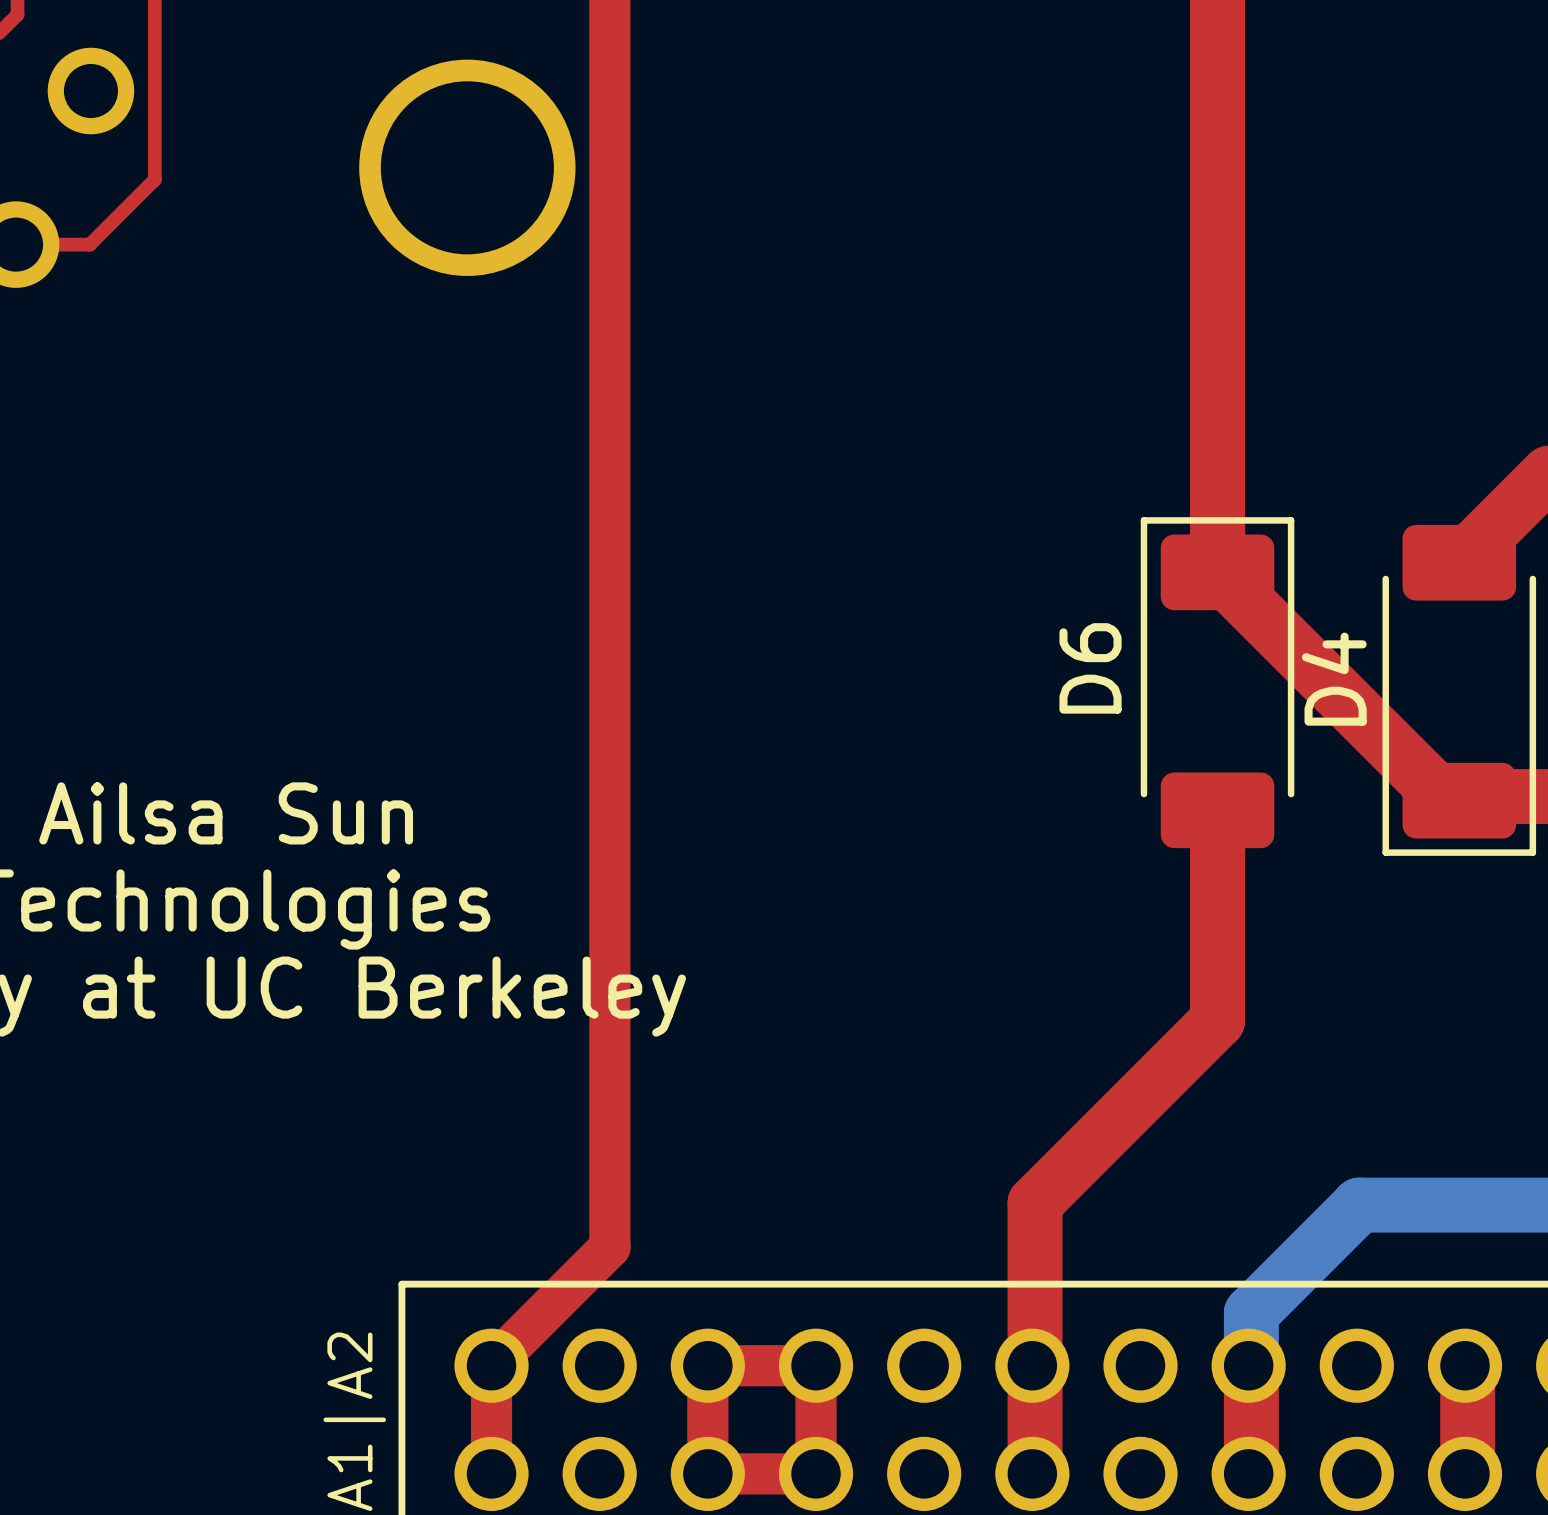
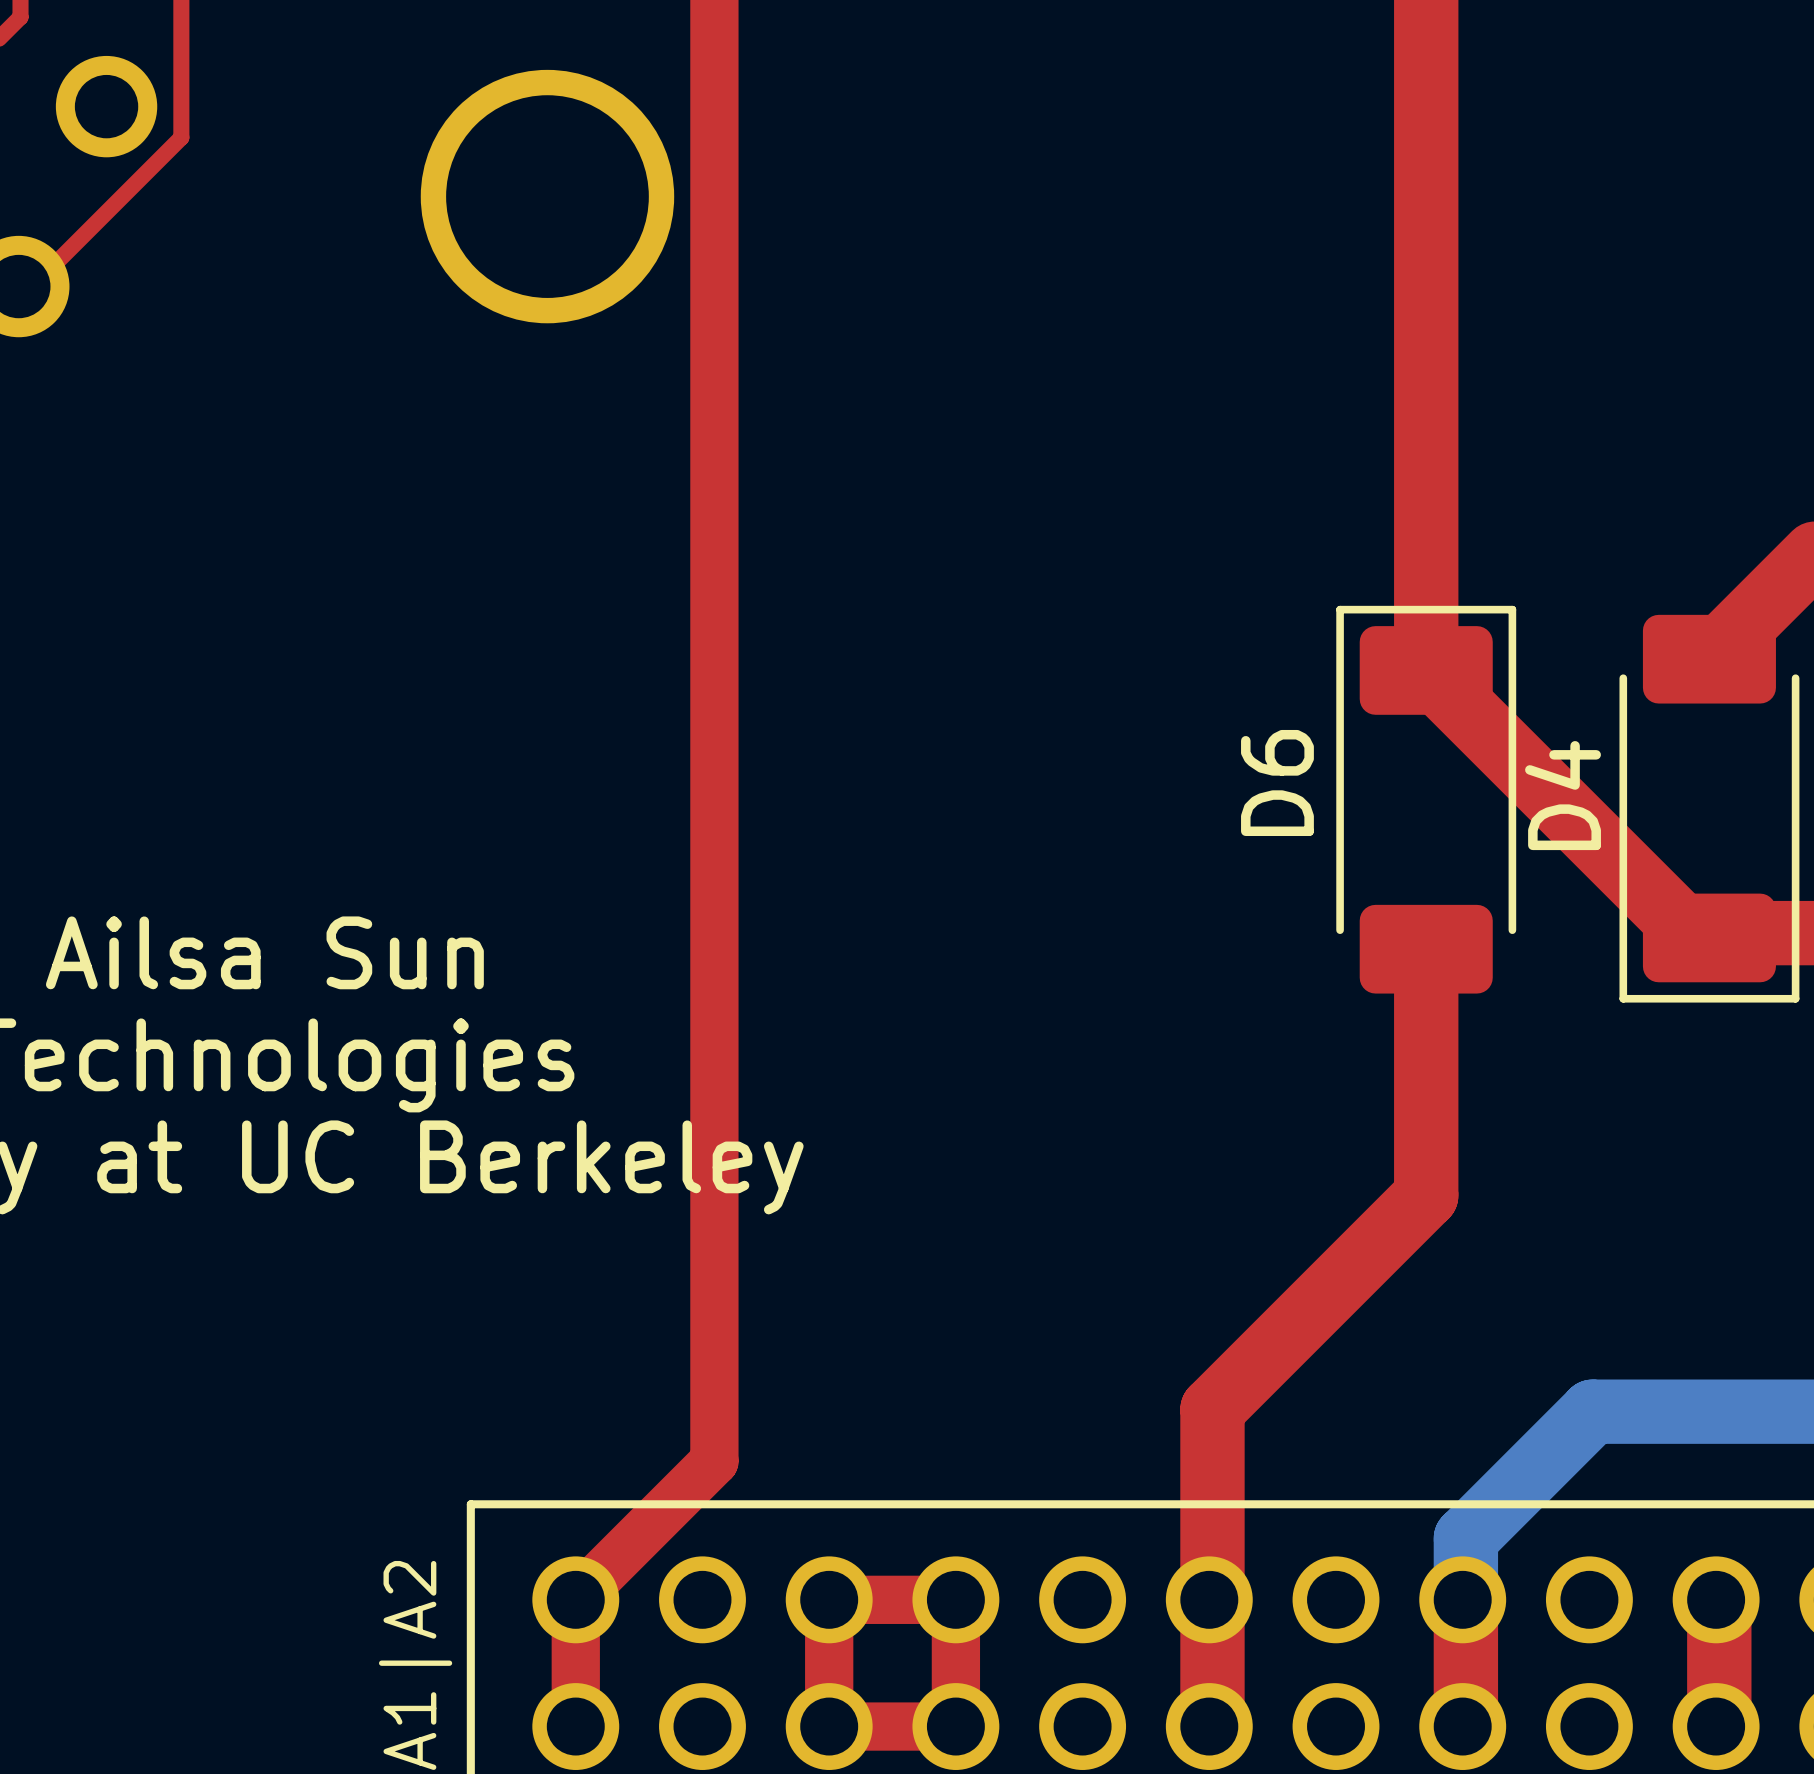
top track: (154, 117) (154, 179) (89, 244) (27, 244) -> (181, 137) (32, 286)

